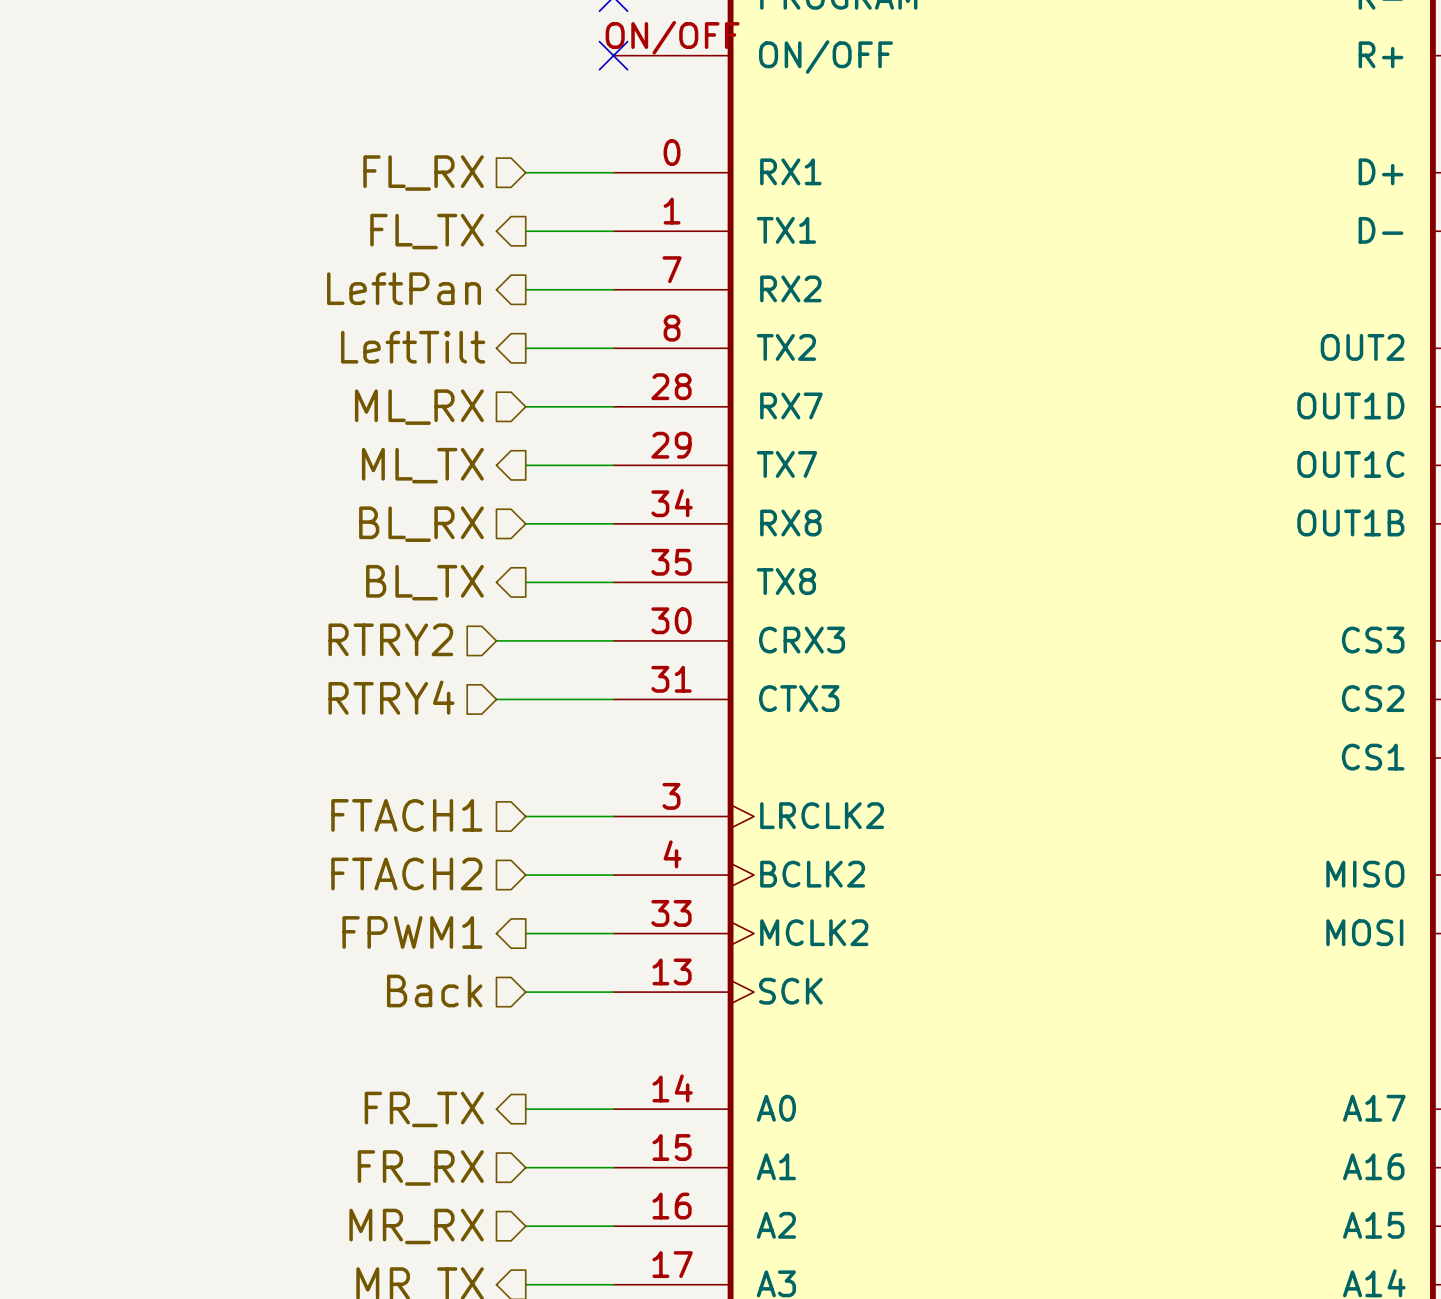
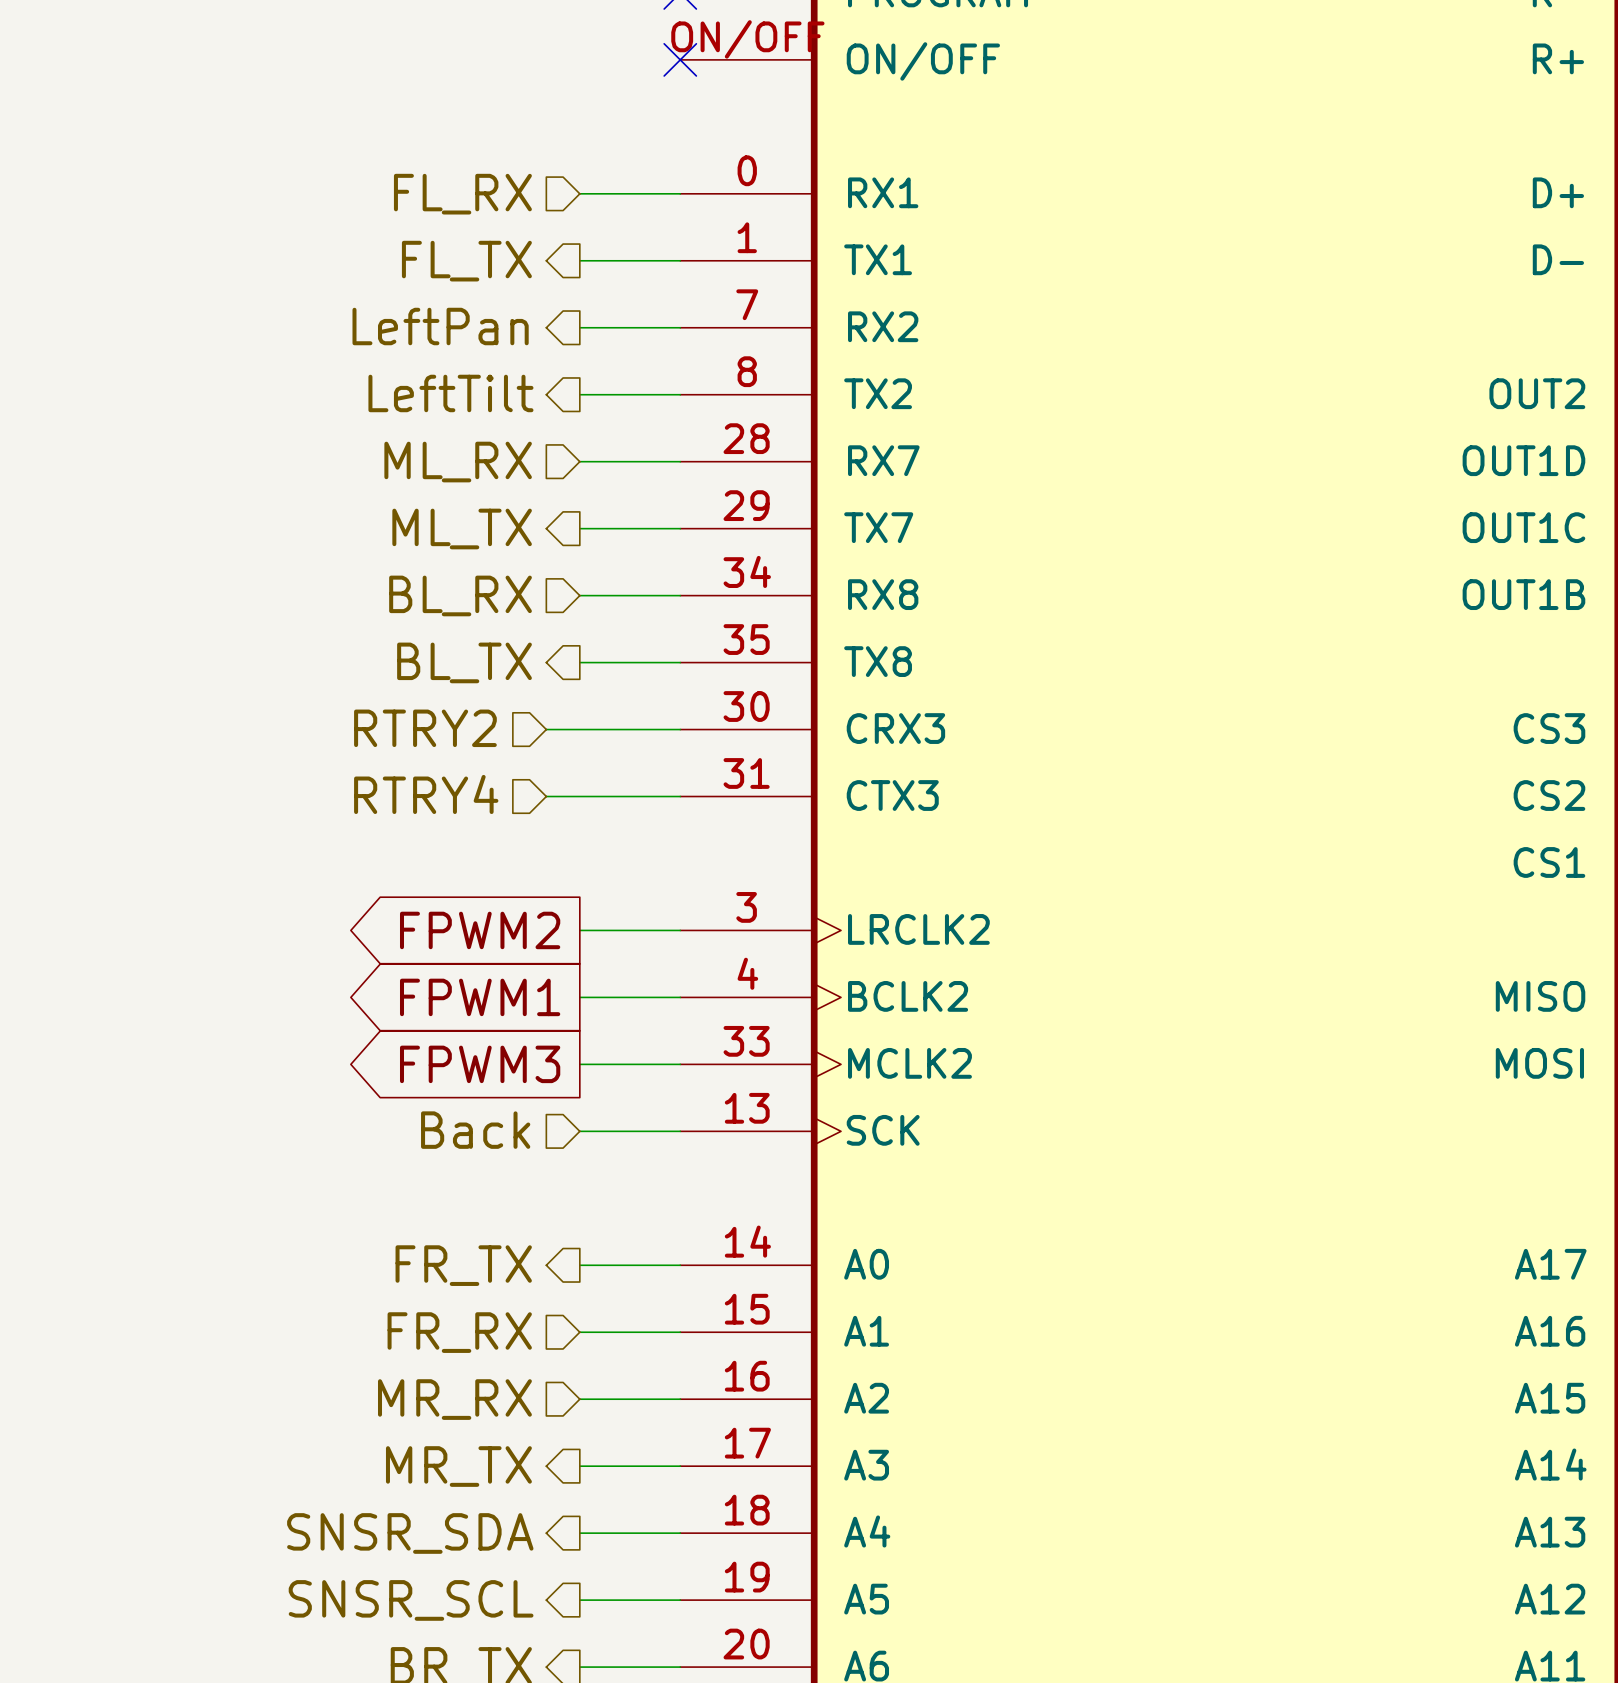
hierarchical label: FTACH1 (406, 815) -> none
global label: none -> FPWM2 (480, 930)
hierarchical label: FTACH2 (406, 873) -> none
global label: none -> FPWM1 (480, 997)
hierarchical label: FPWM1 (412, 932) -> none
global label: none -> FPWM3 (480, 1064)

